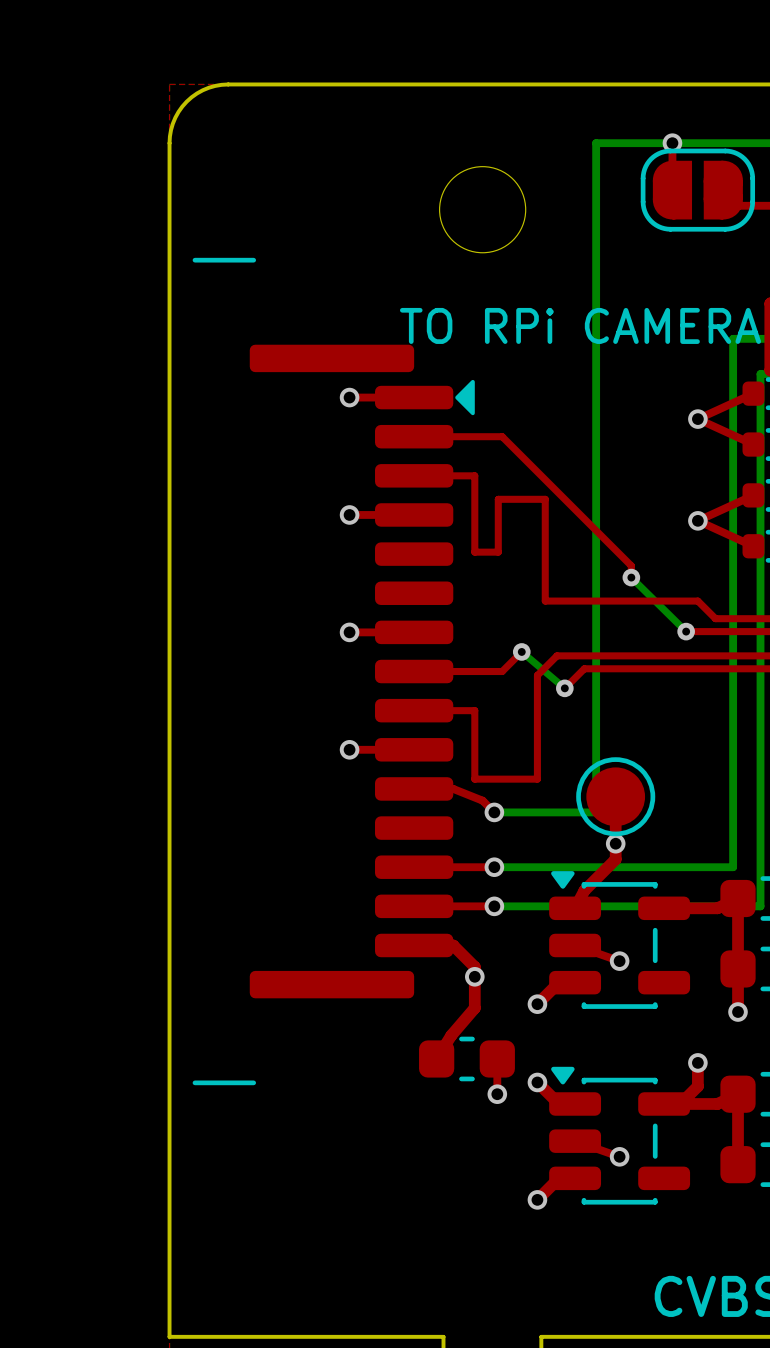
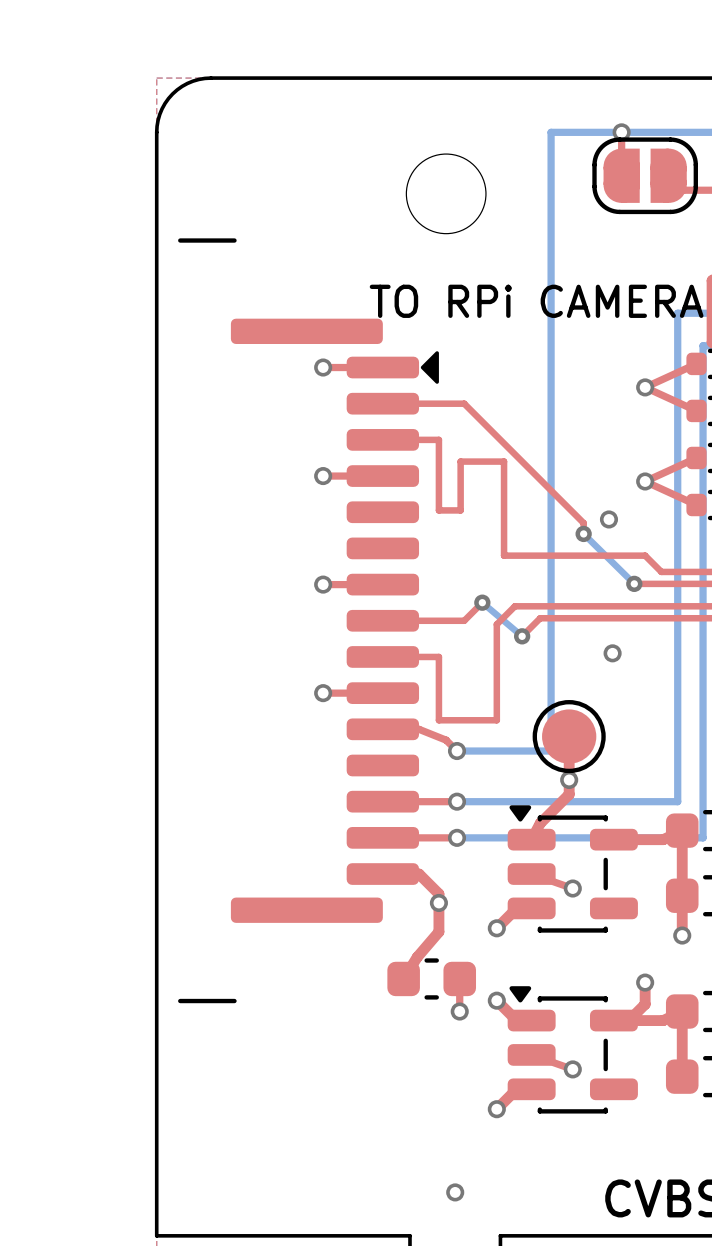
via: none -> (608, 519)
via: none -> (612, 653)
via: none -> (455, 1192)

